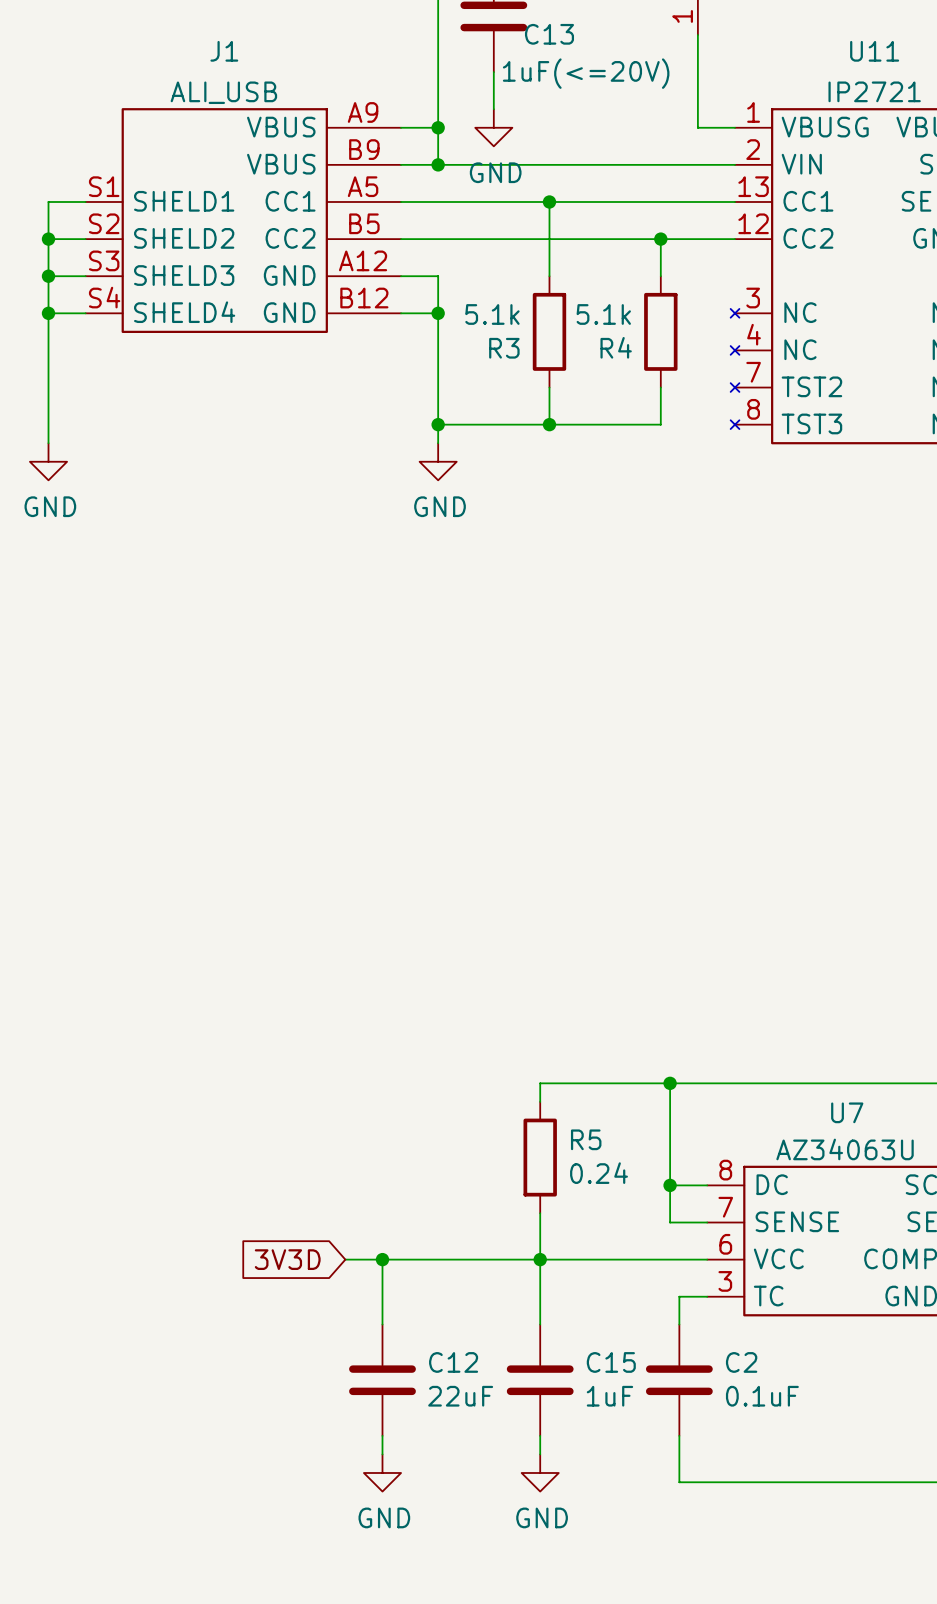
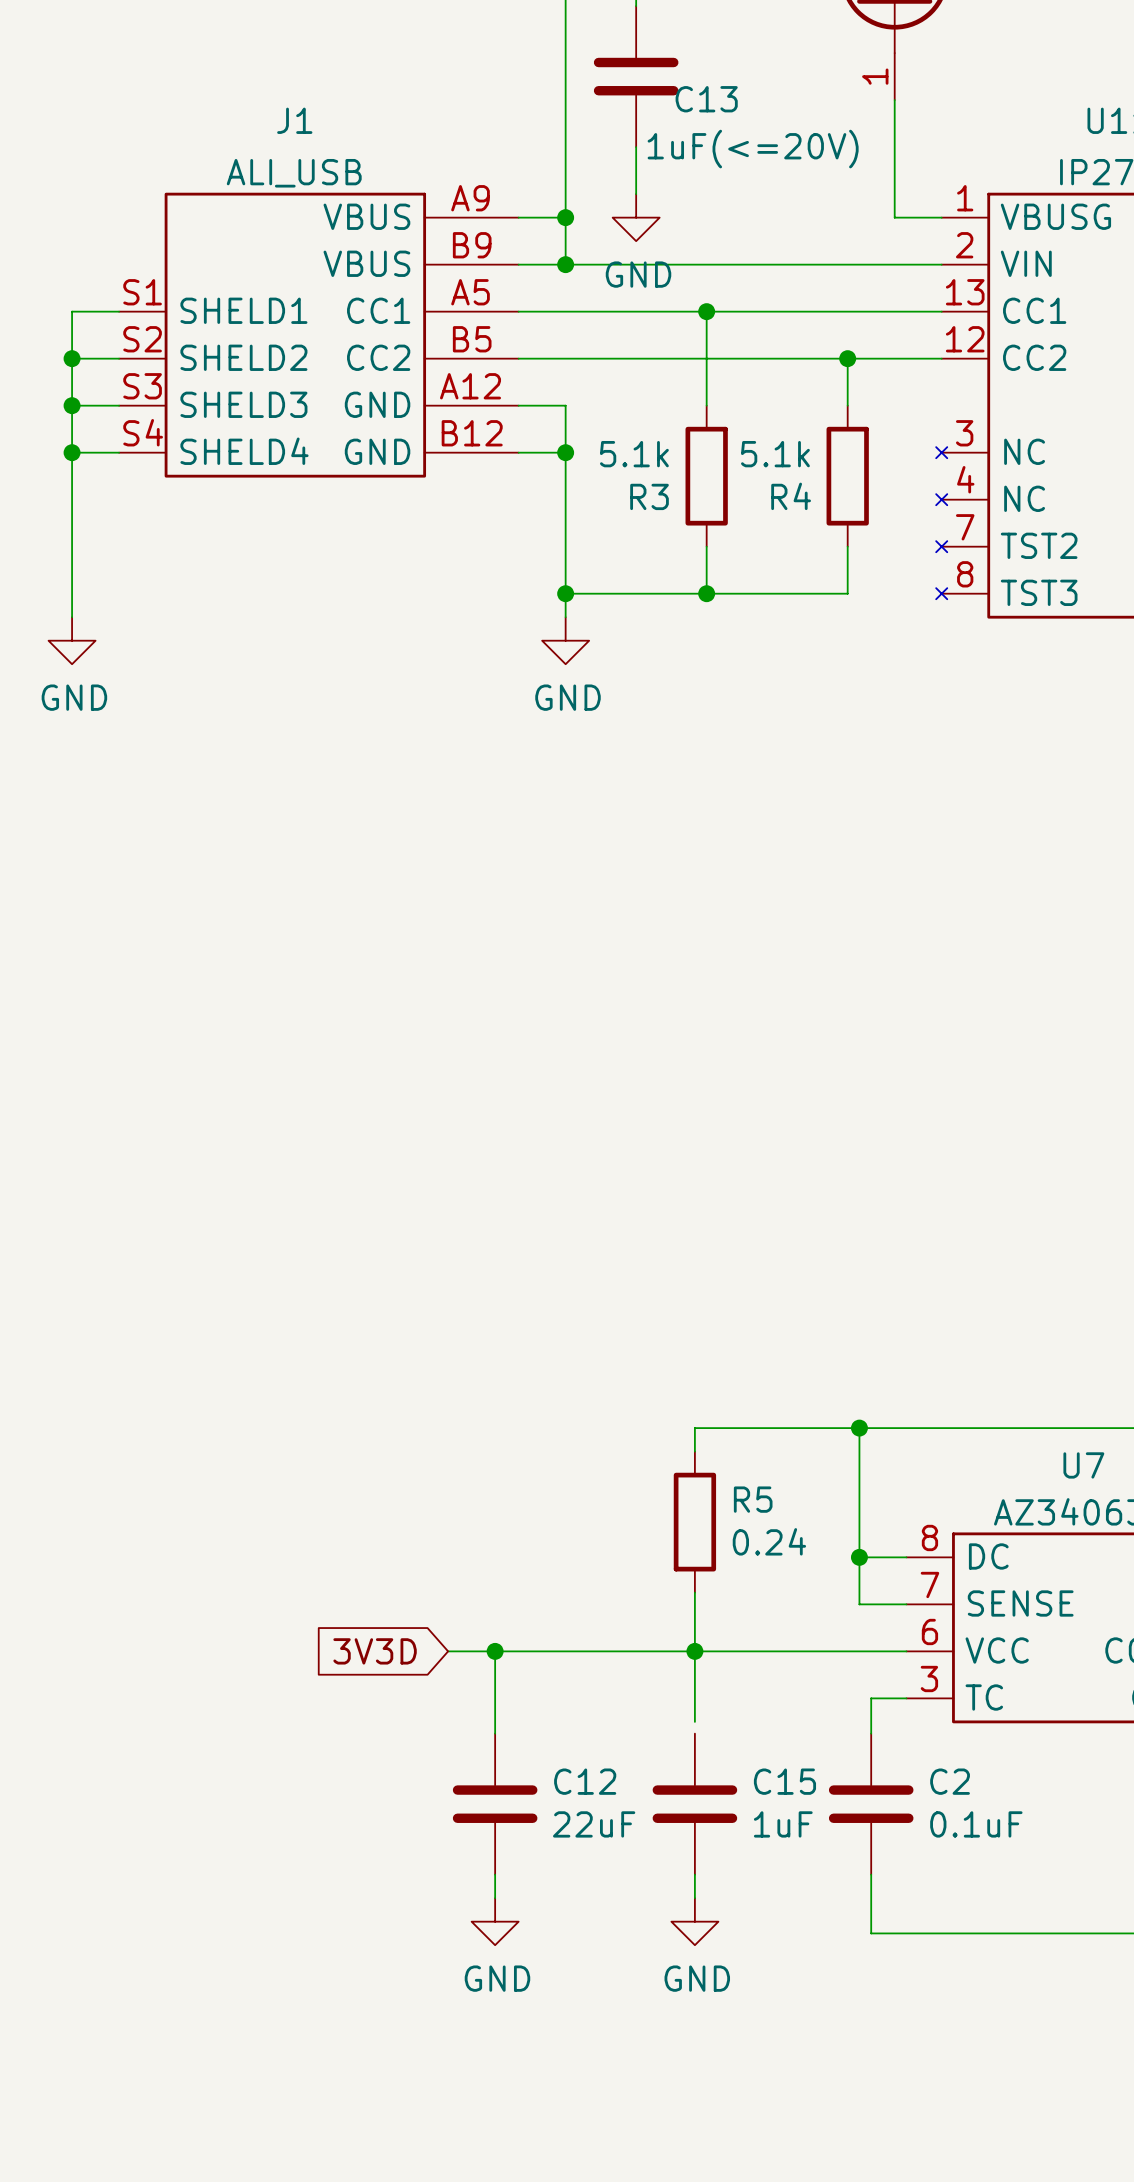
wire: (540, 1315) (540, 1324) -> none

